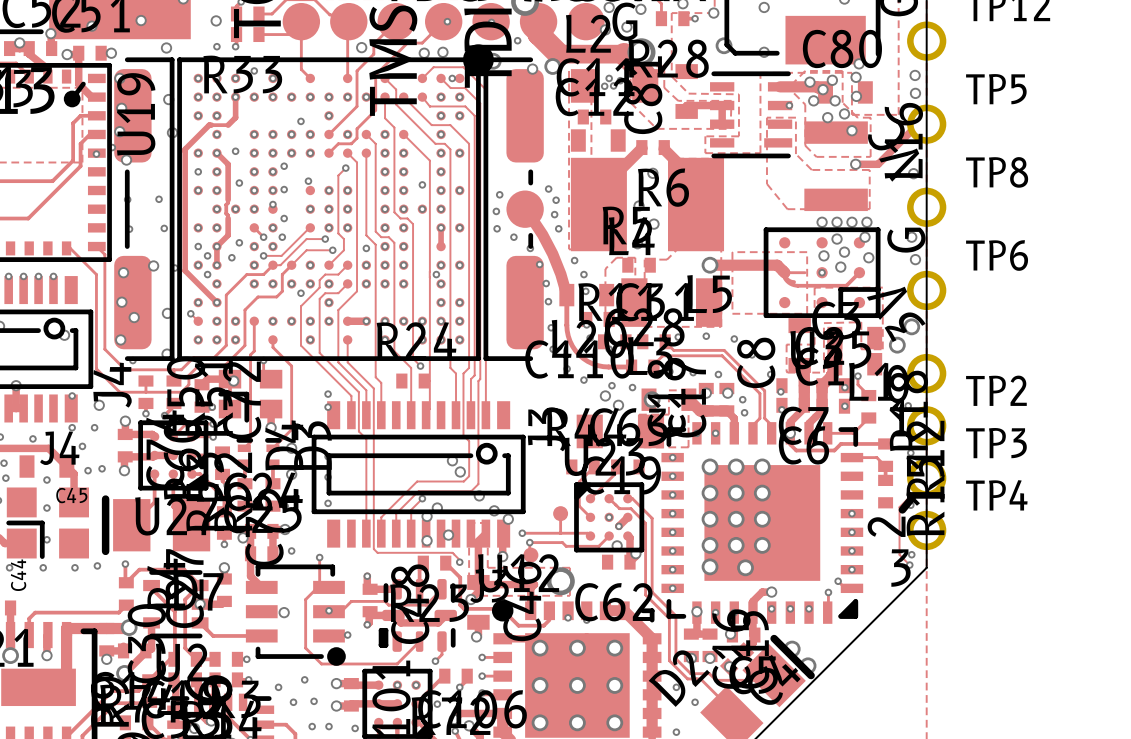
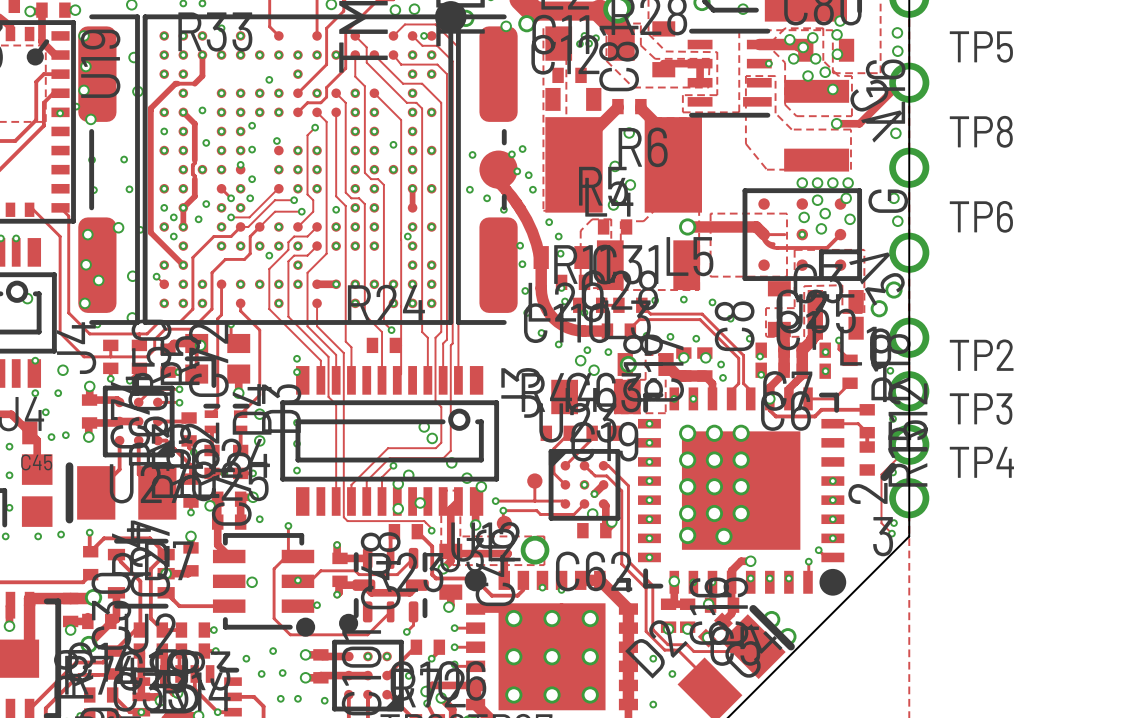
via: none -> (511, 154)
via: (556, 200) -> none
track: none -> (487, 169) (520, 208) (532, 231) (539, 256)
track: (525, 209) (542, 234) (552, 254) (566, 295) -> none
via: none -> (517, 171)
via: (496, 211) -> none
via: (539, 264) -> none
track width: thin (566, 295) (568, 336) (579, 354) (597, 365) (631, 367) -> thick (541, 257) (542, 299) (553, 318) (572, 329) (607, 331)
part footprint: [661, 422, 864, 624] -> [638, 387, 847, 596]
part footprint: [378, 579, 457, 652] -> [339, 547, 429, 633]

